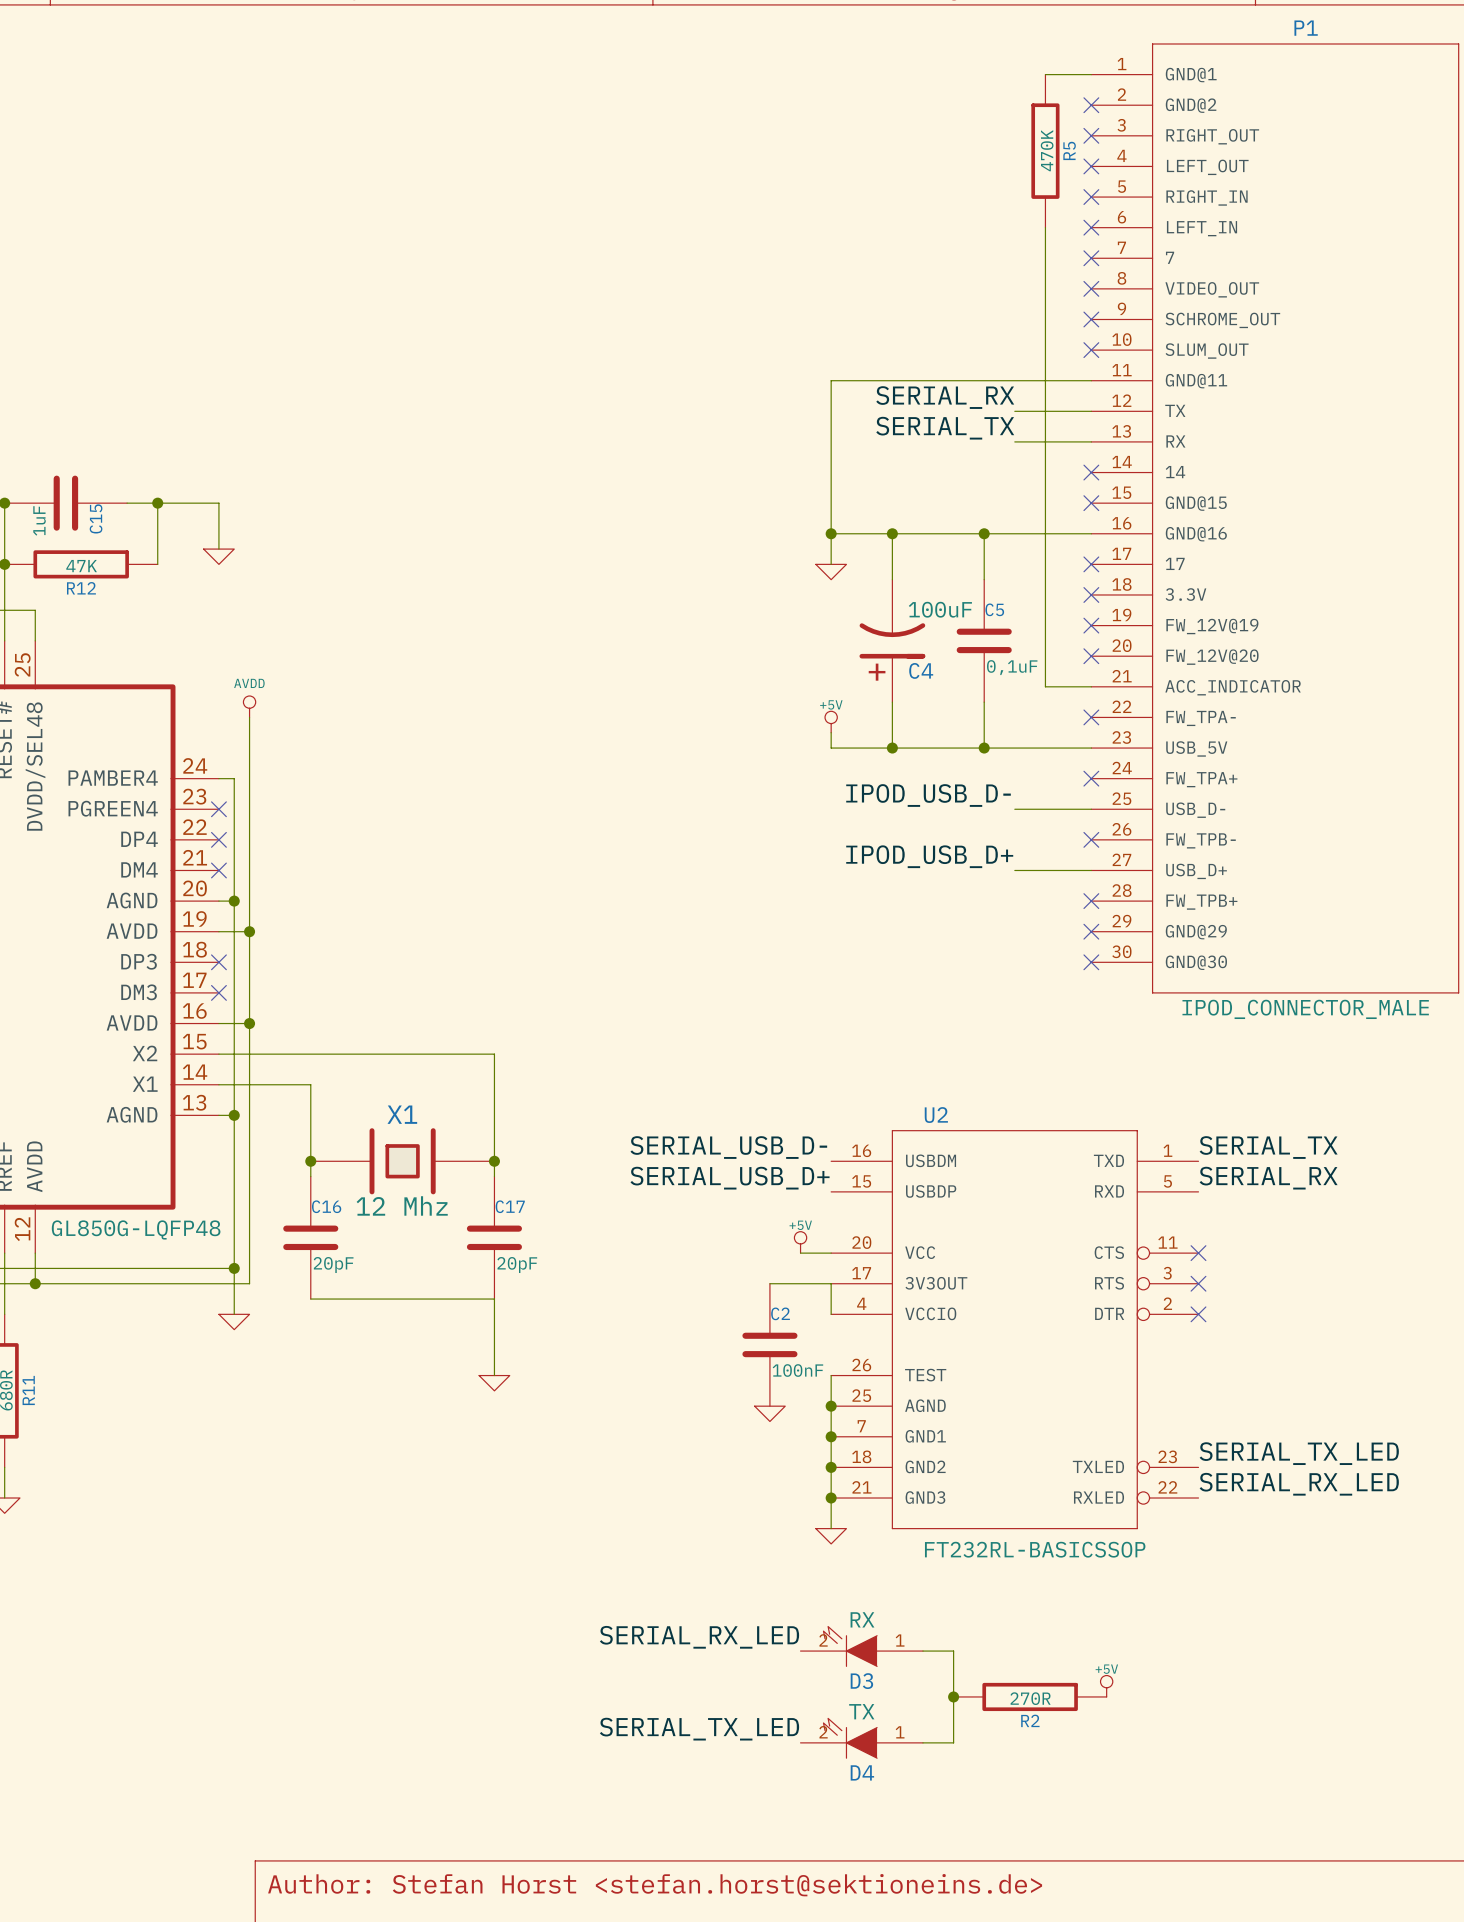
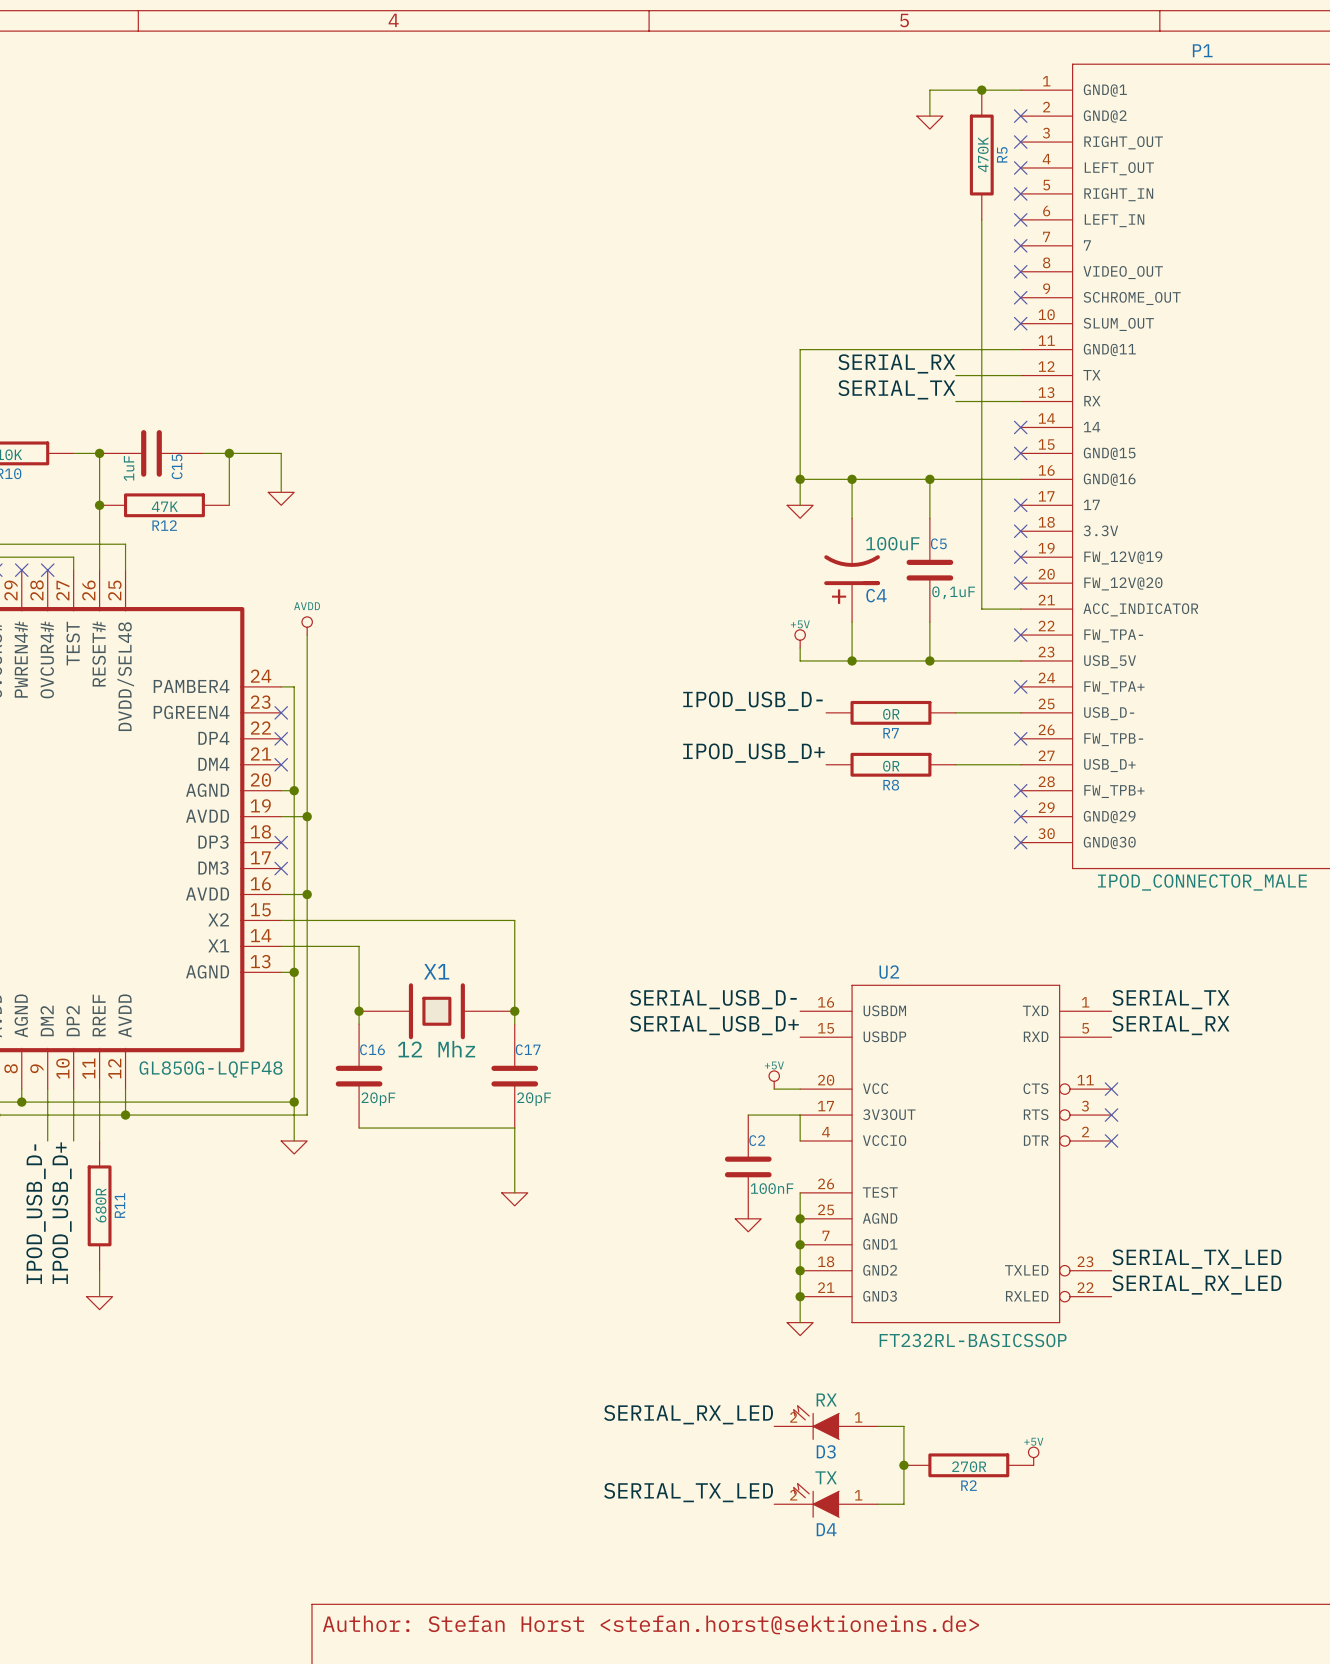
wire: none -> (981, 90) (929, 90) (929, 116)
junction: none -> (981, 90)
power symbol: none -> (929, 122)
label position: IPOD_USB_D- (928, 795) -> IPOD_USB_D- (752, 701)
R7: none -> 0R (890, 712)
label position: IPOD_USB_D+ (929, 856) -> IPOD_USB_D+ (753, 753)
R8: none -> 0R (890, 764)

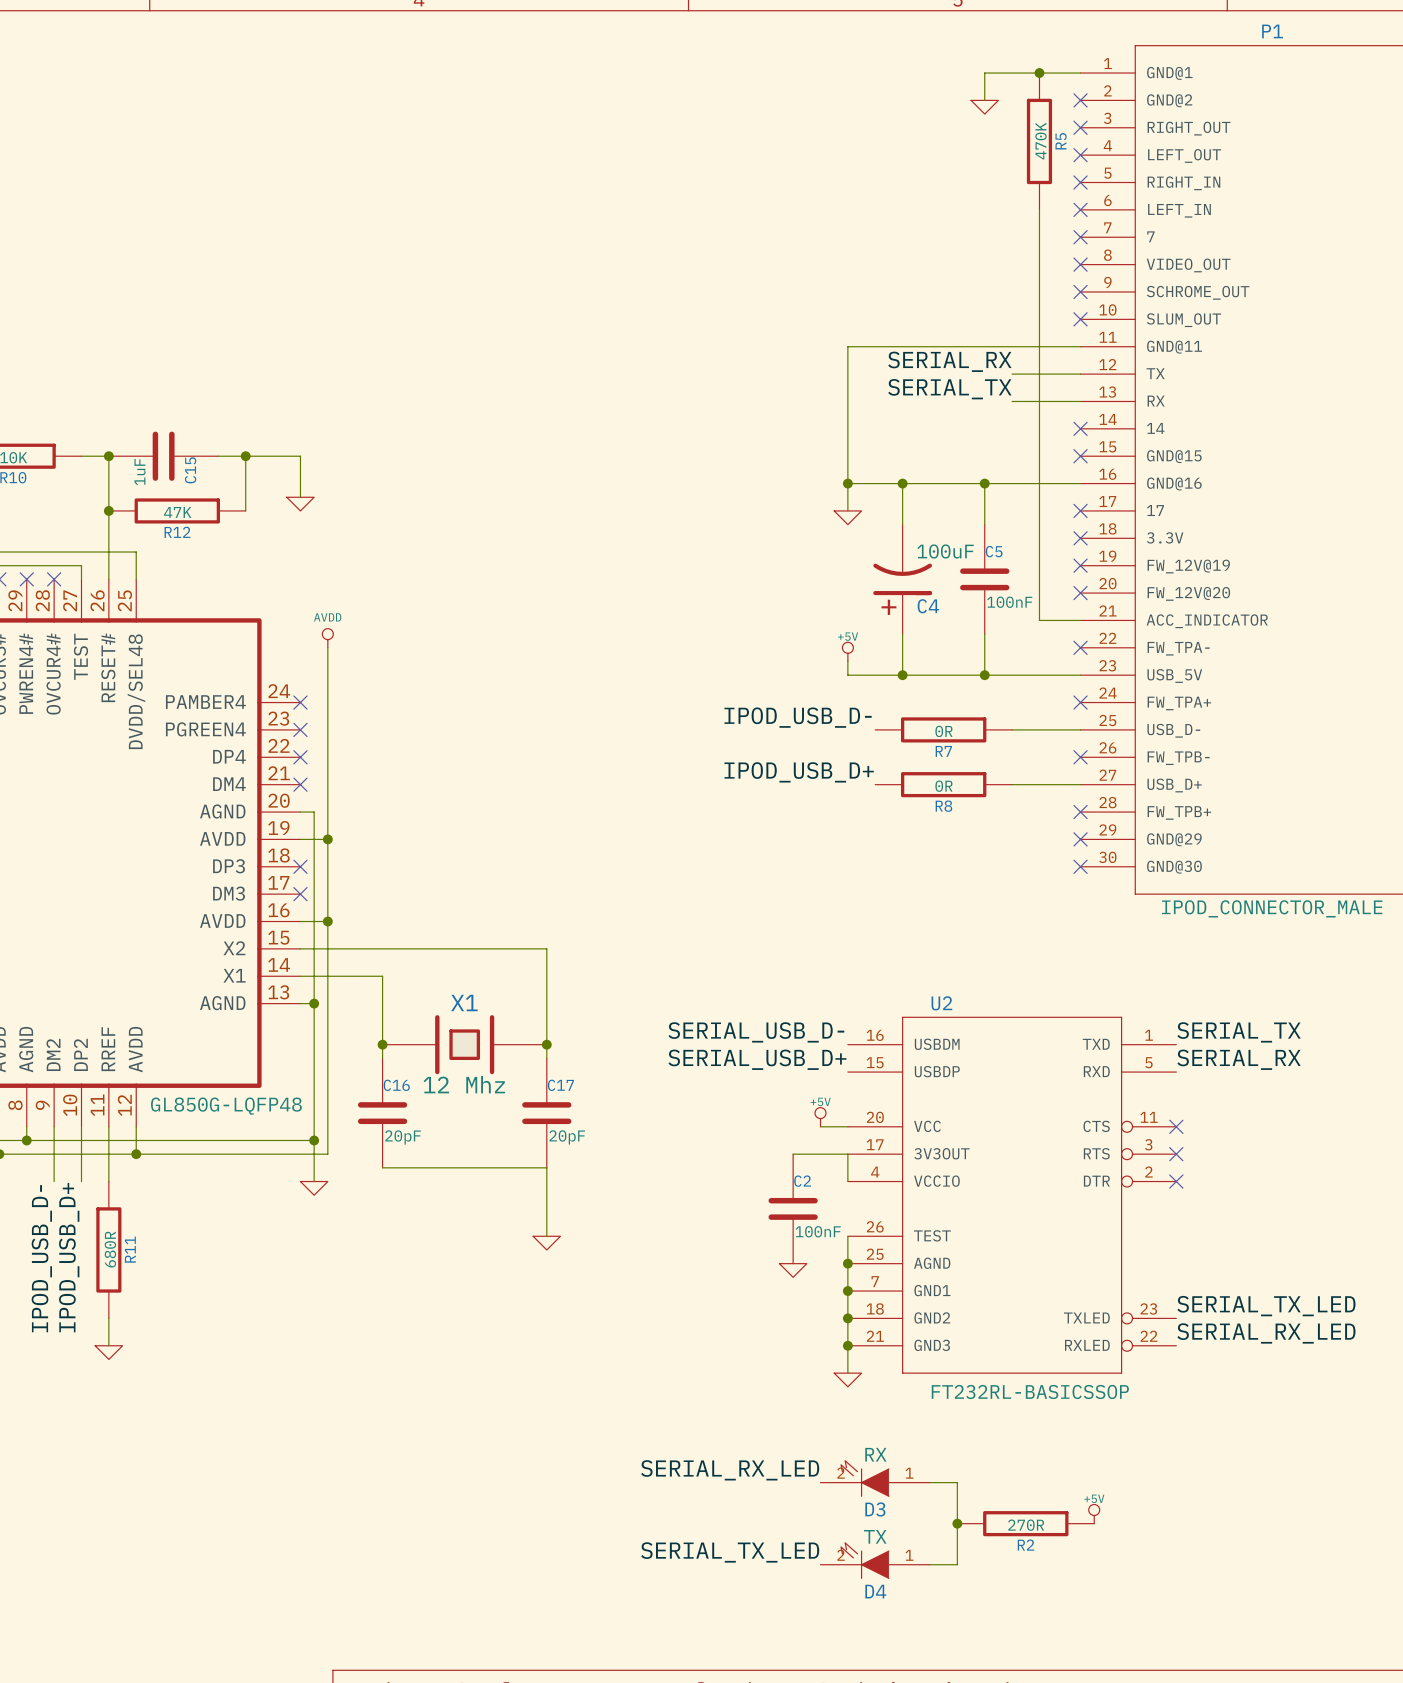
C5 value: 0,1uF (953, 592) -> 100nF (1009, 602)
wire: (281, 686) (294, 686) (294, 790) -> none
no-connect mark: none -> (300, 702)
junction: (294, 790) -> none

